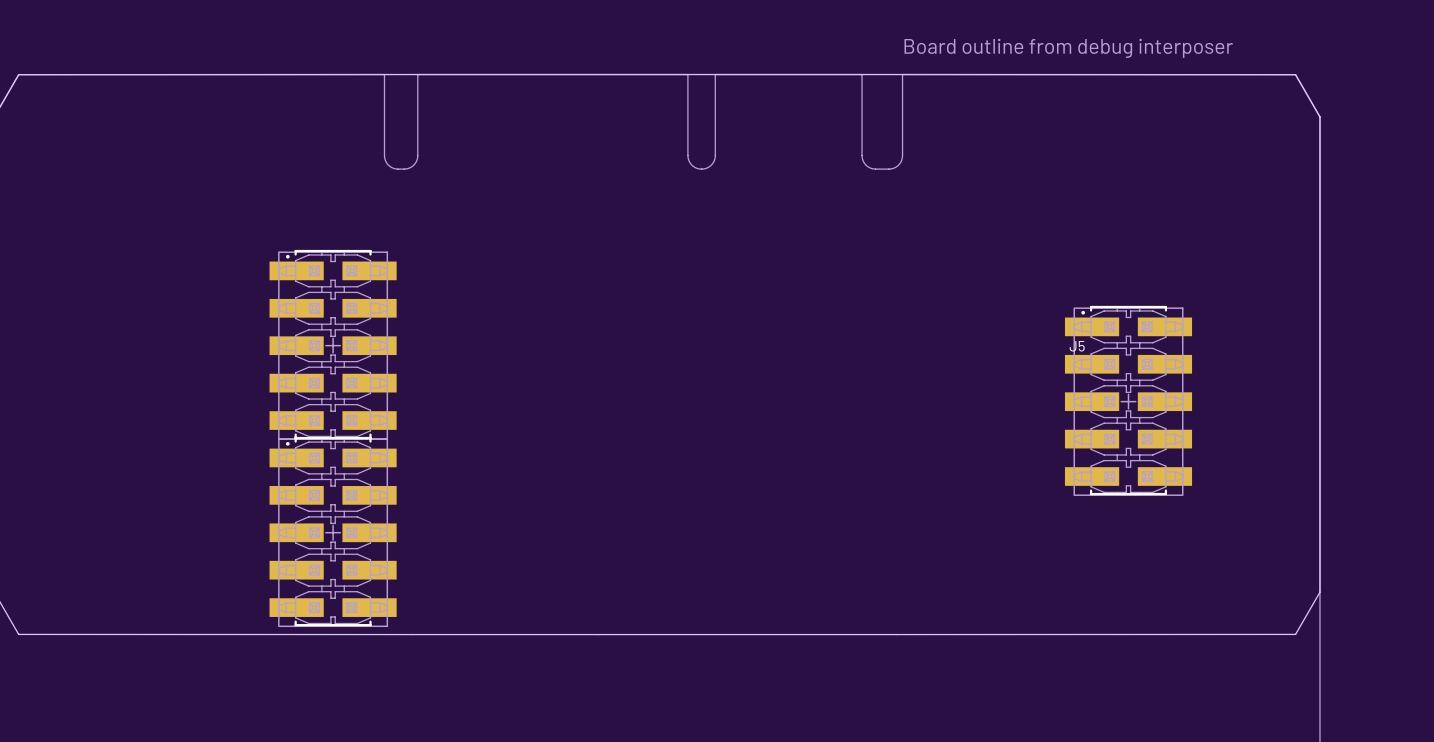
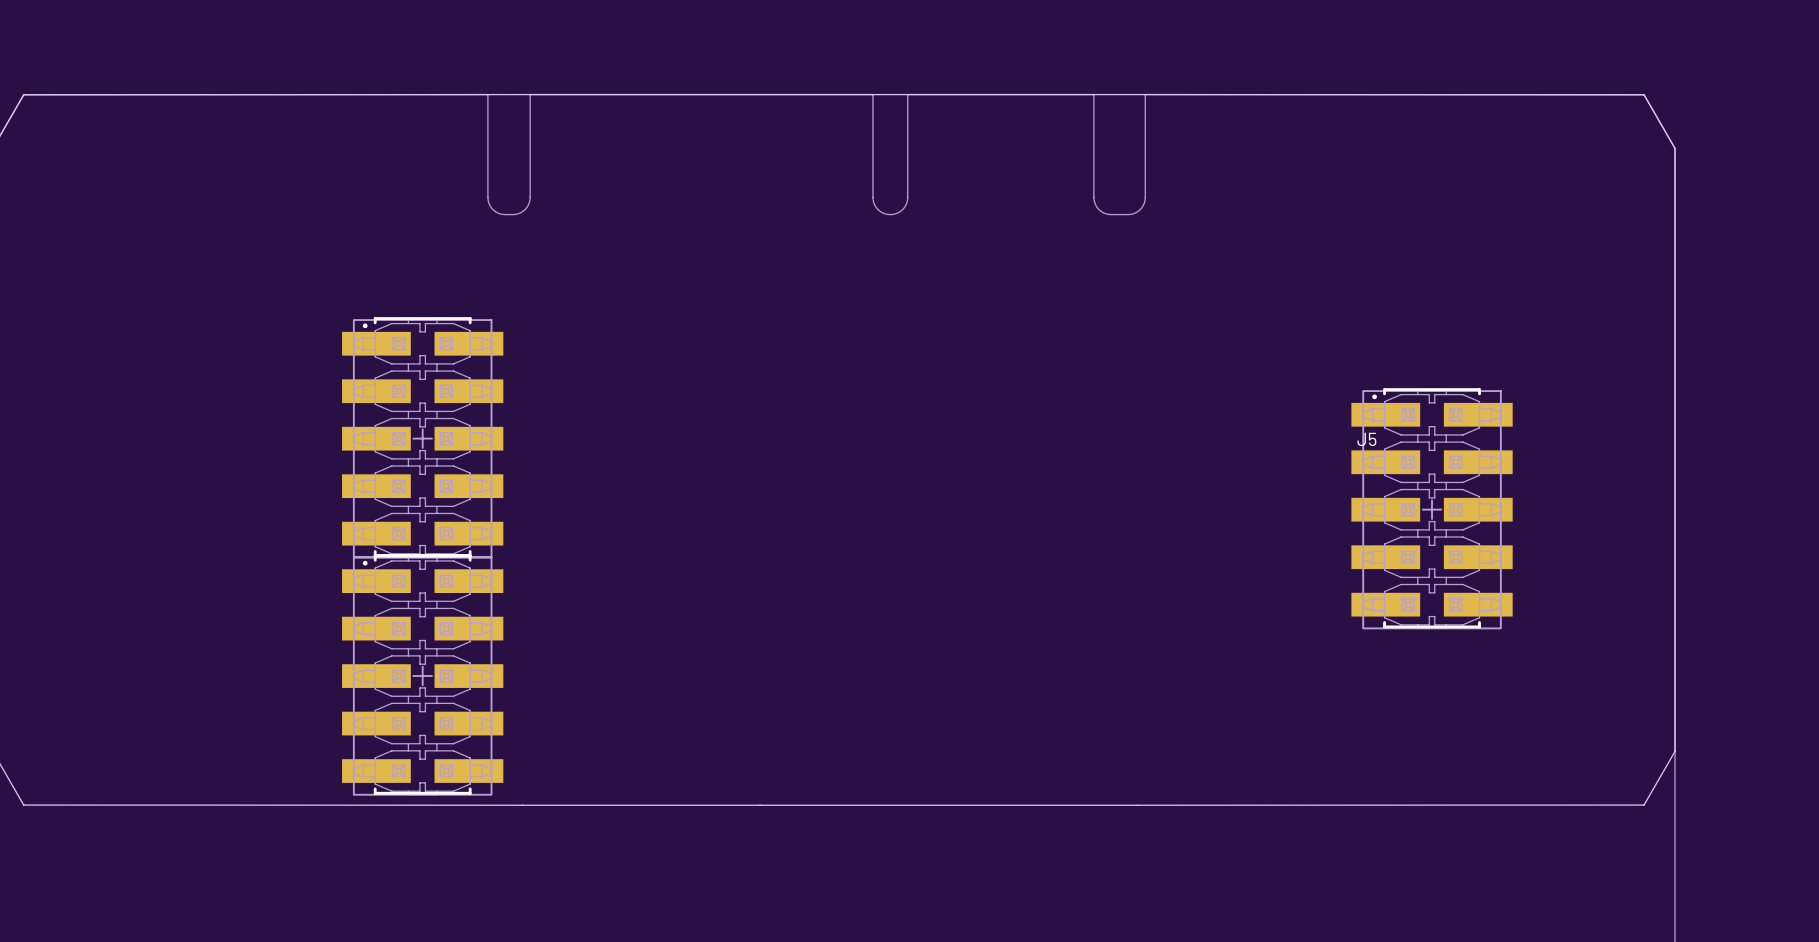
text: Board outline from debug interposer (1068, 48) -> none

